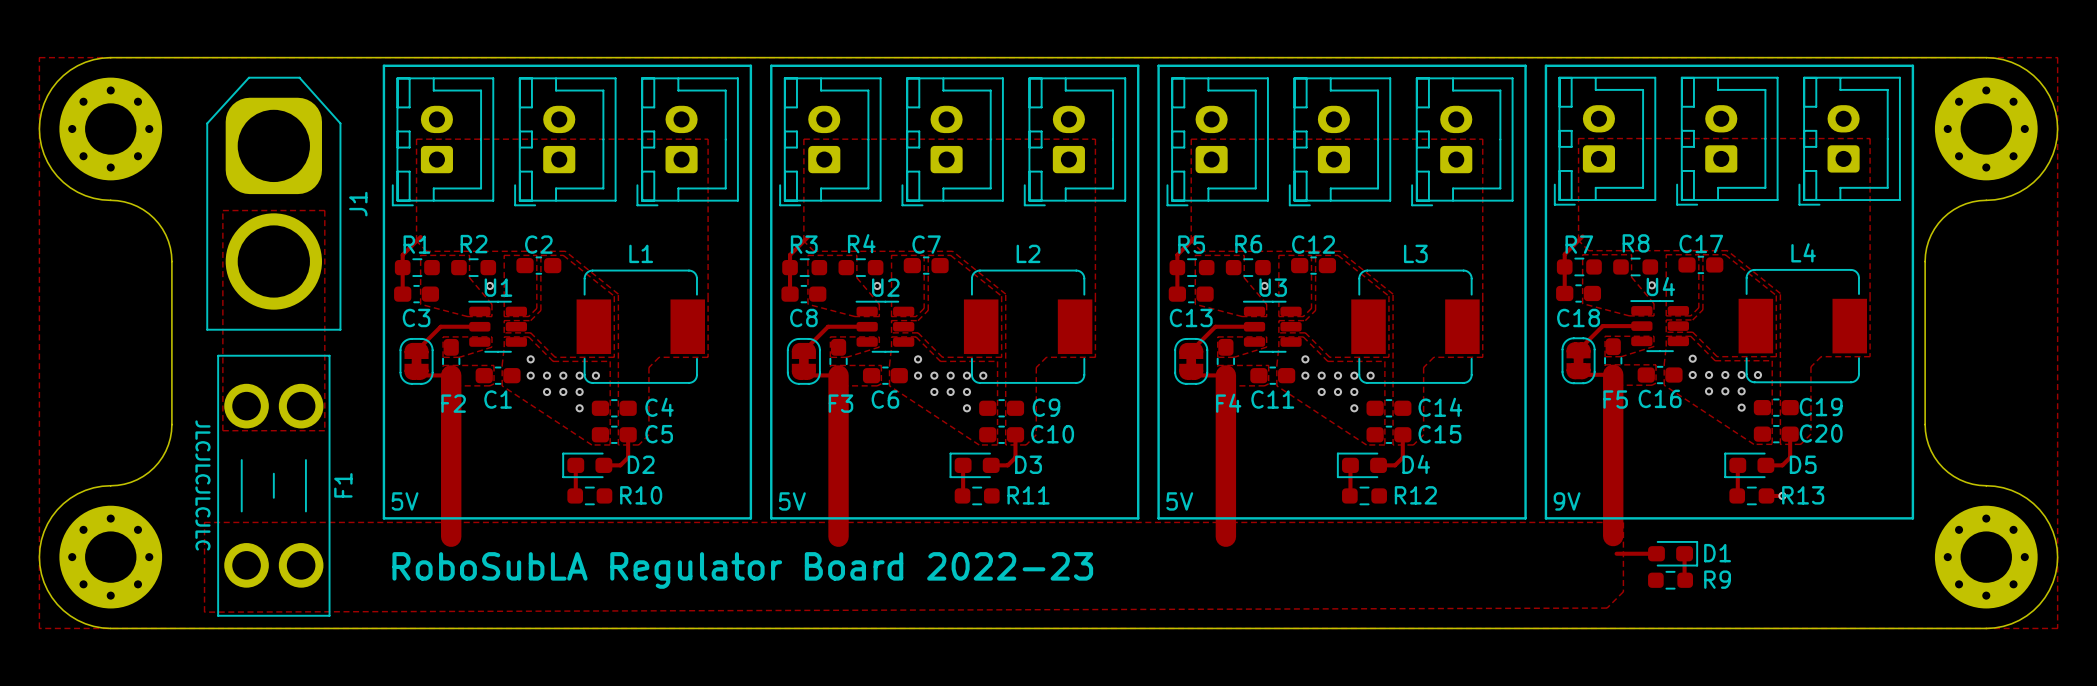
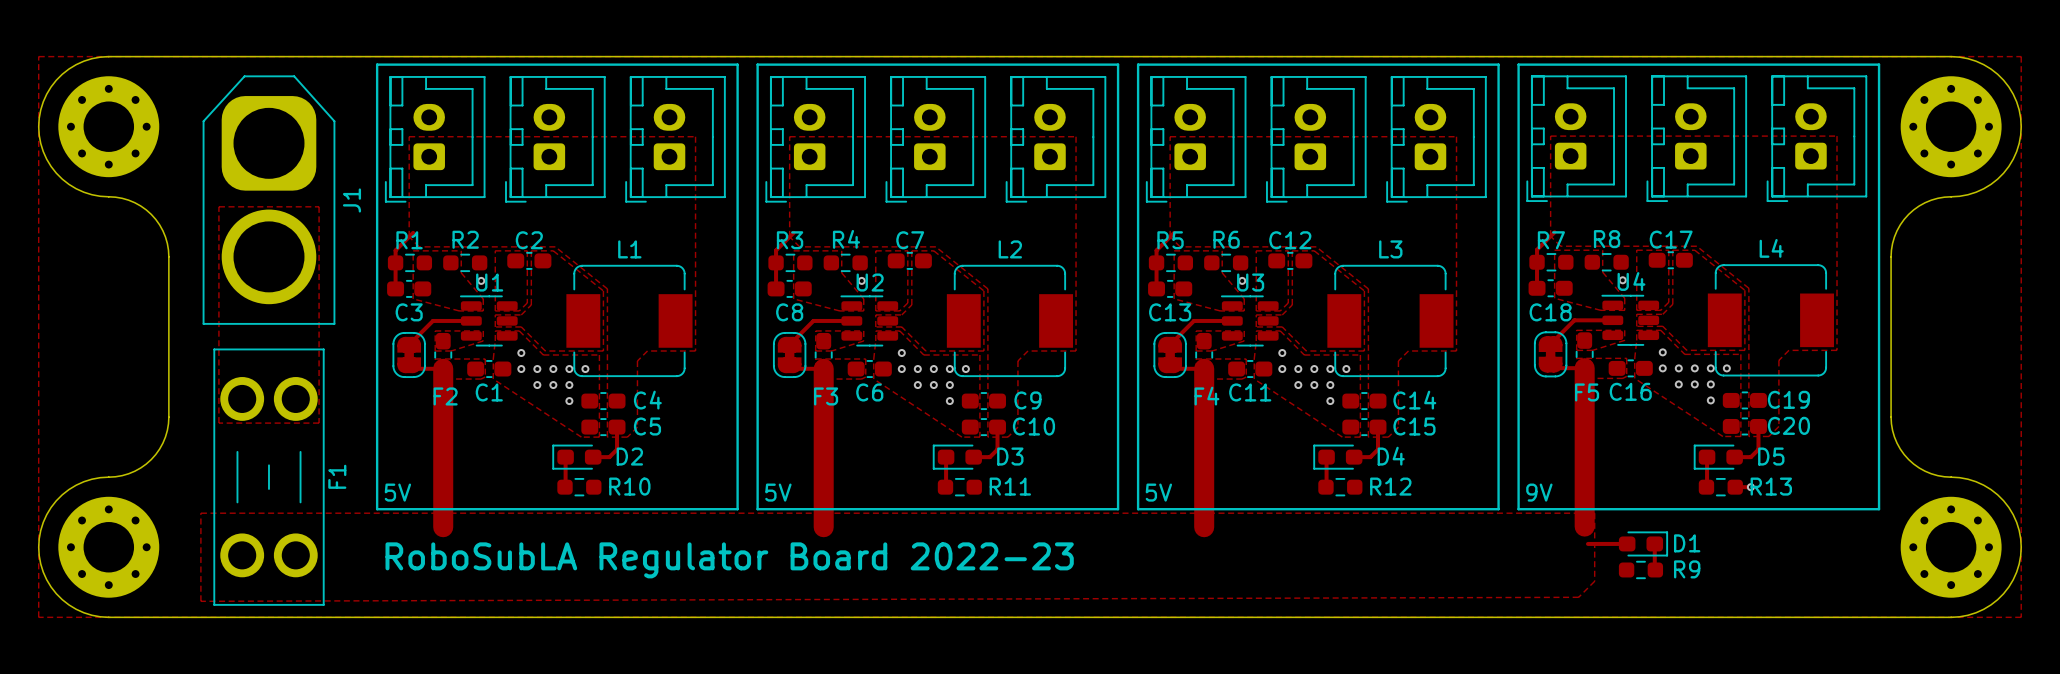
text: JLCJLCJLCJLC (202, 485) -> none

